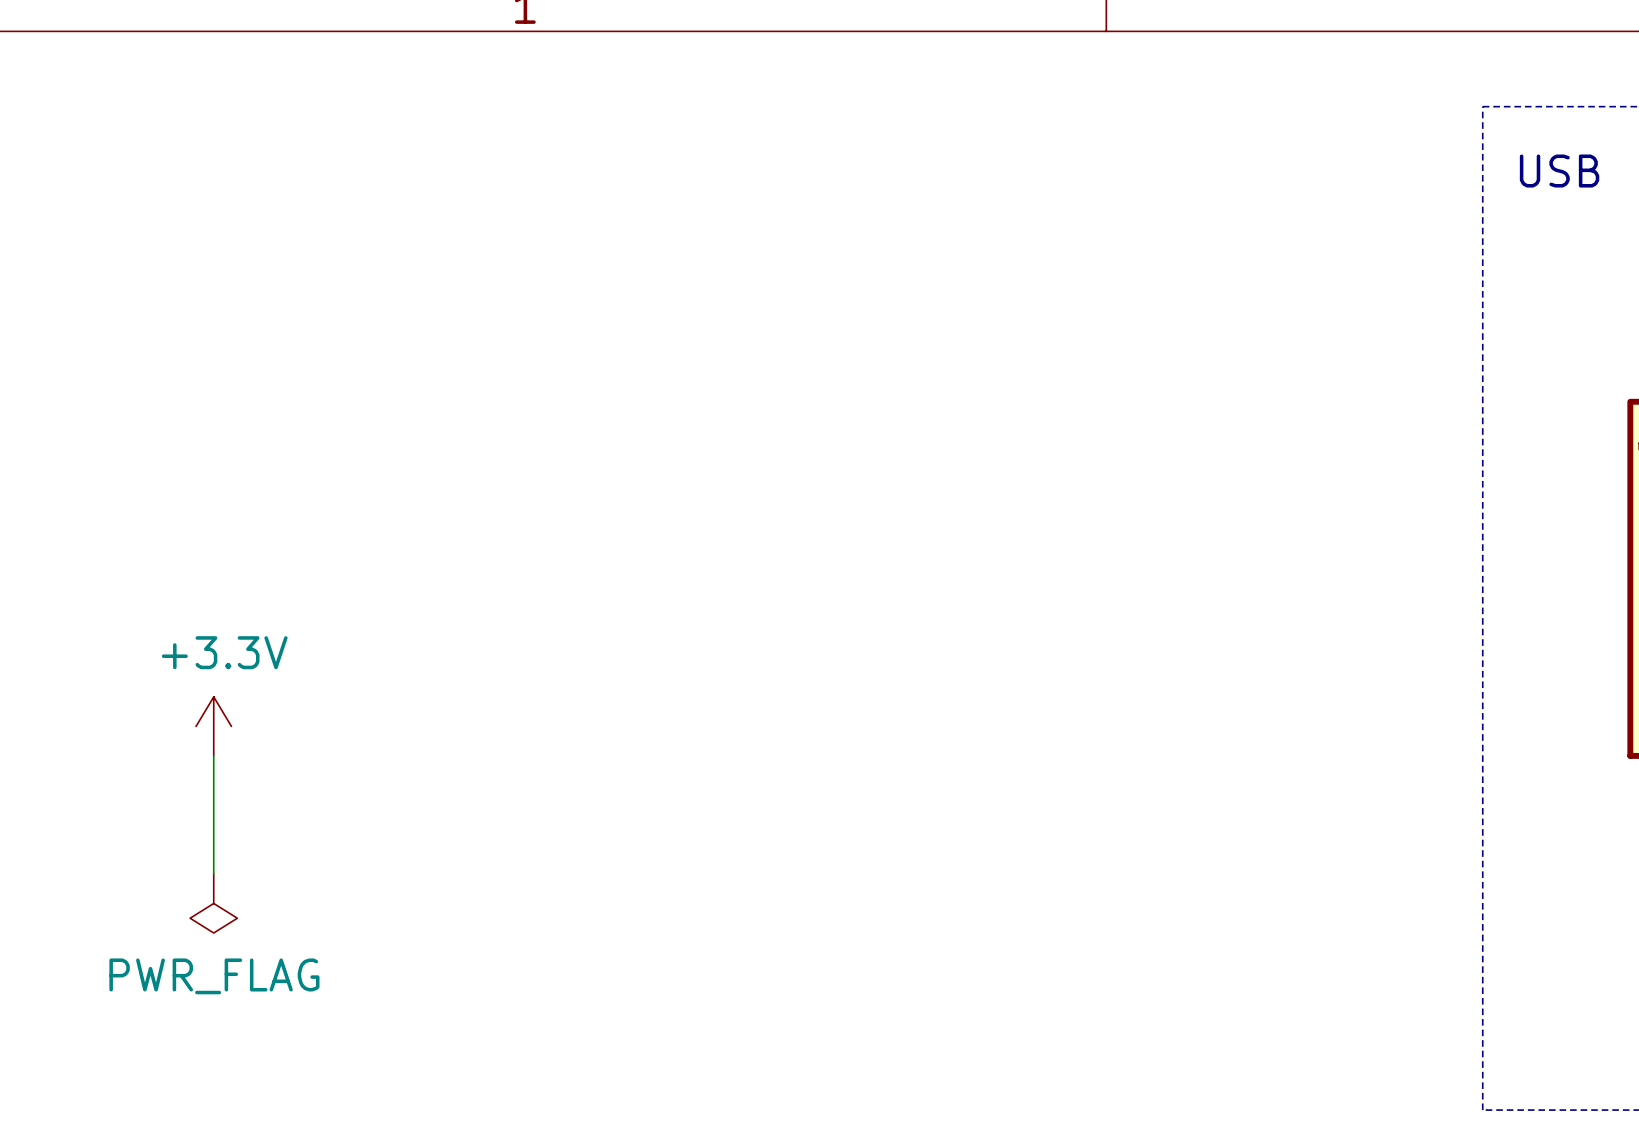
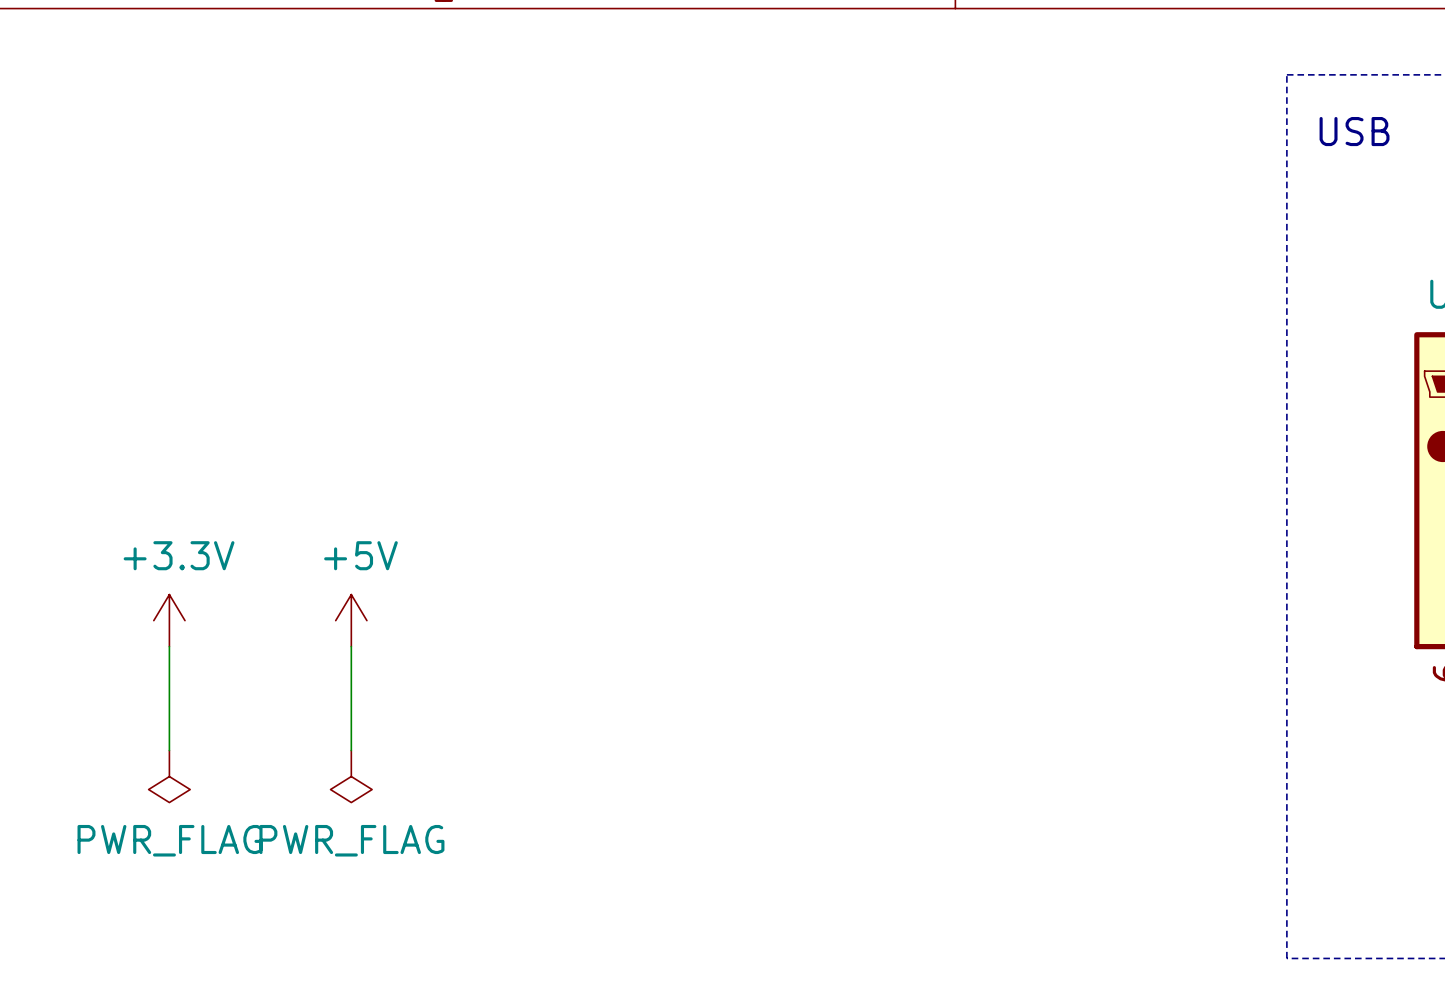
power symbol: none -> +5V (351, 620)
wire: none -> (351, 646) (351, 750)
power symbol: none -> PWR_FLAG (351, 776)

